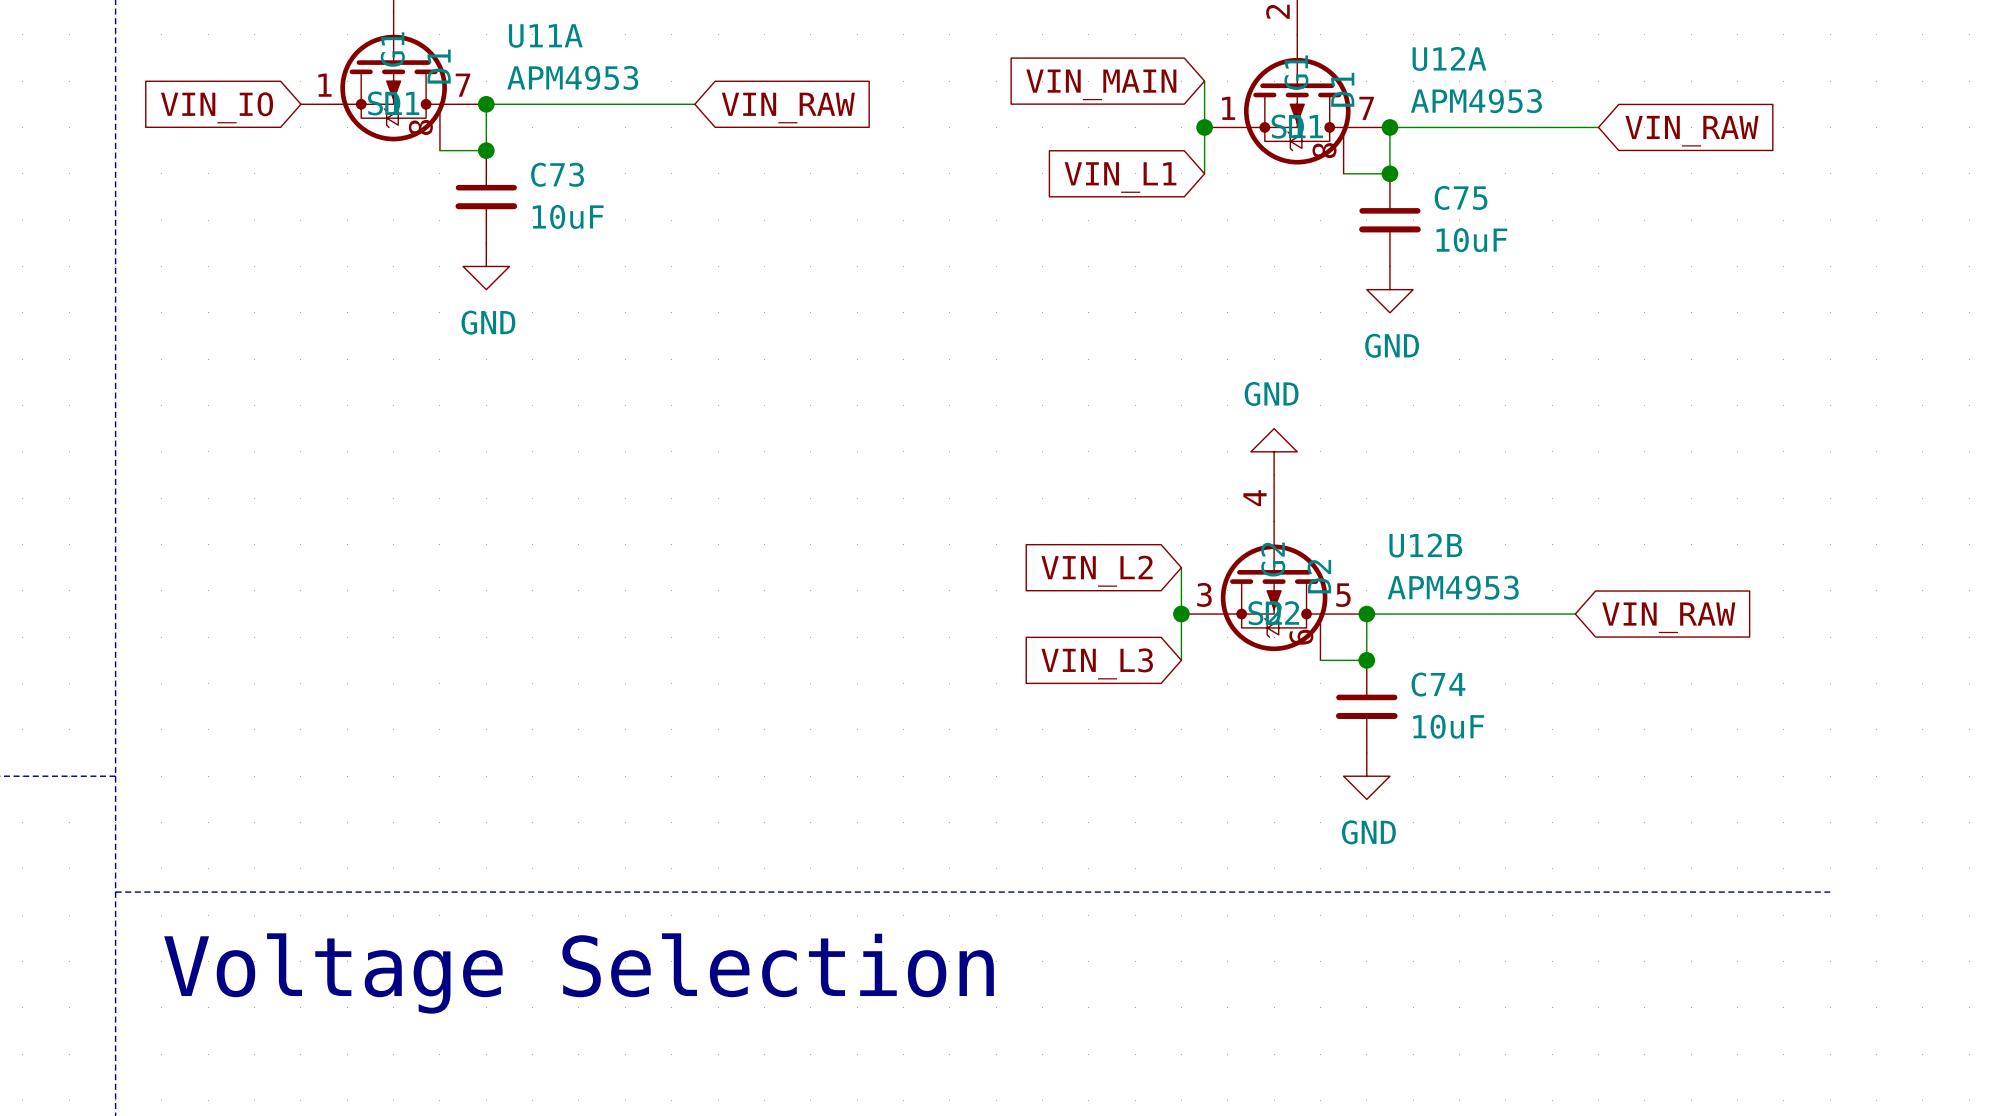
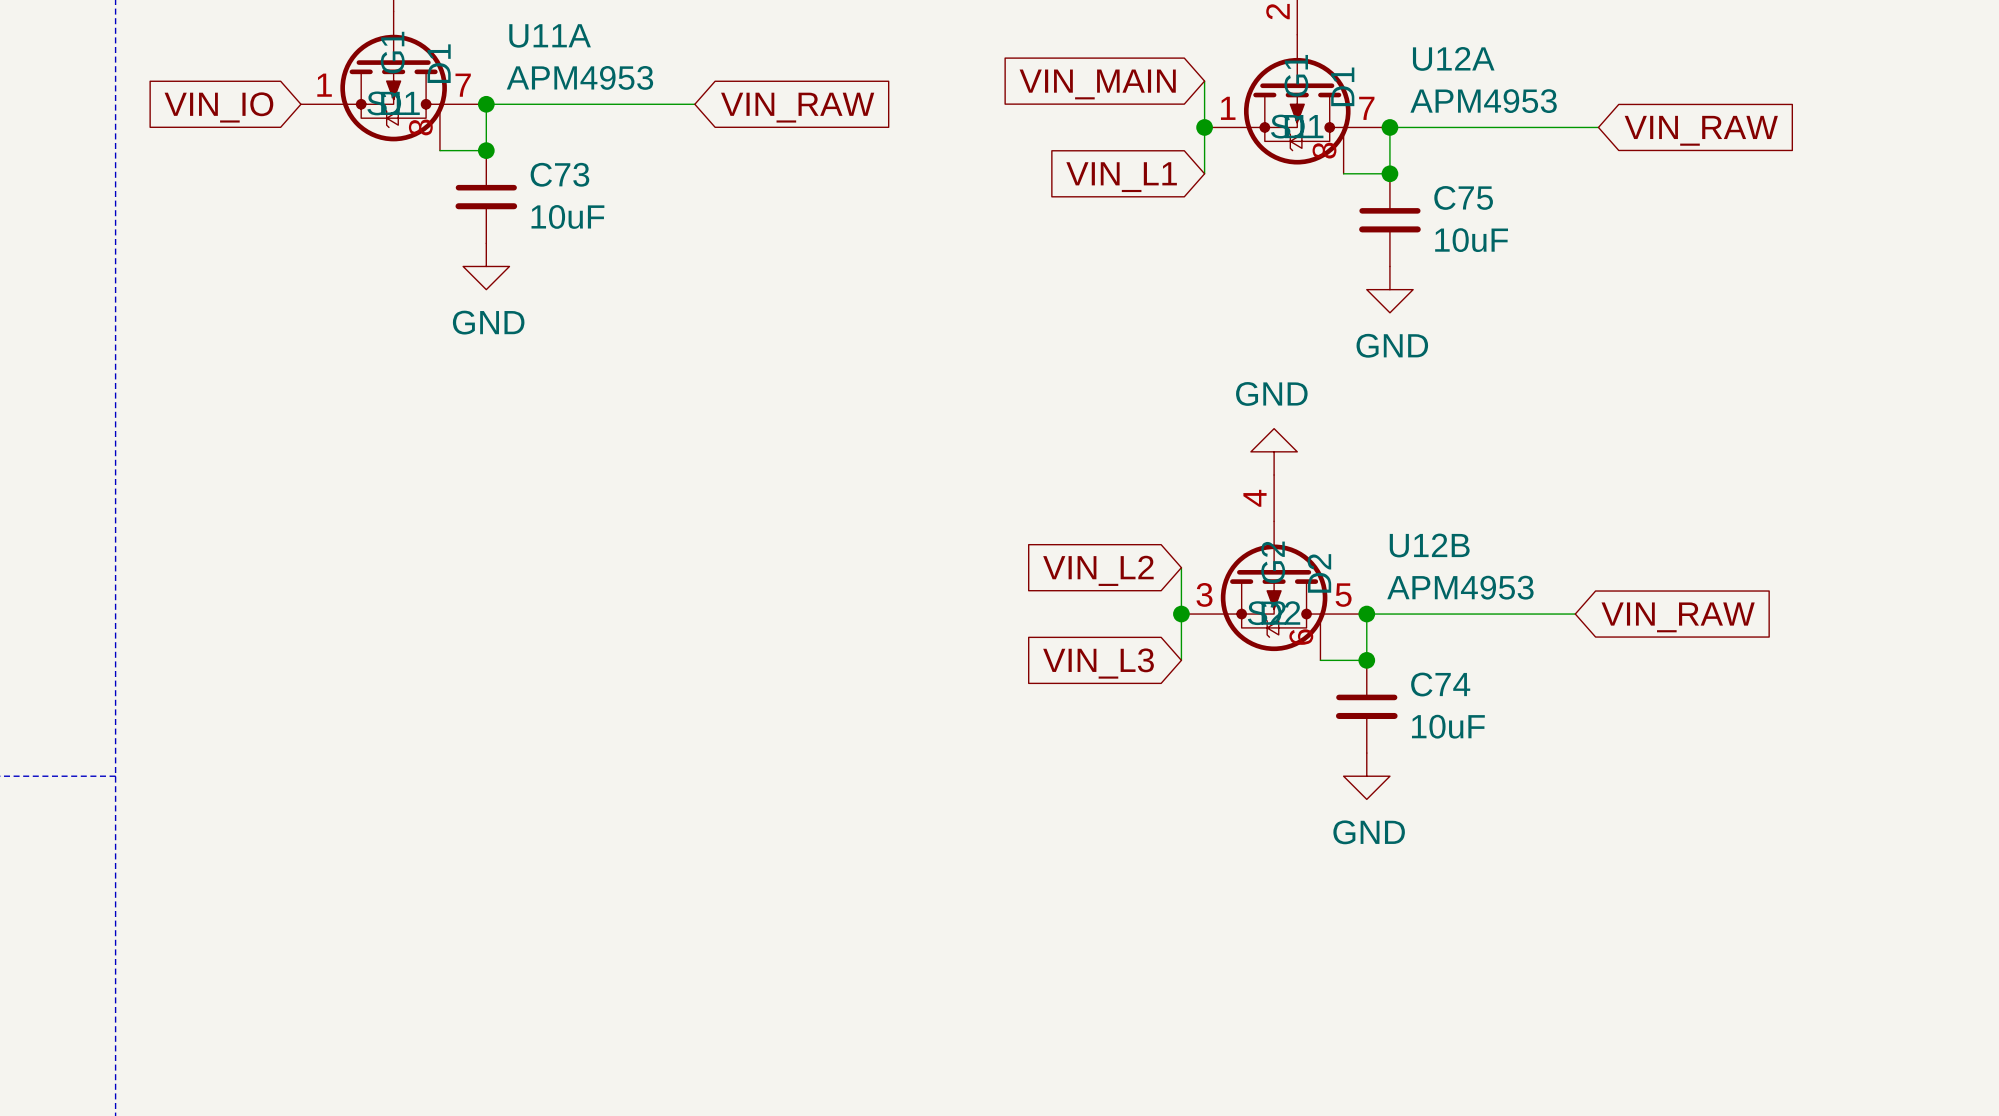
line: (115, 892) (1830, 892) -> none
text: Voltage Selection (579, 973) -> none

